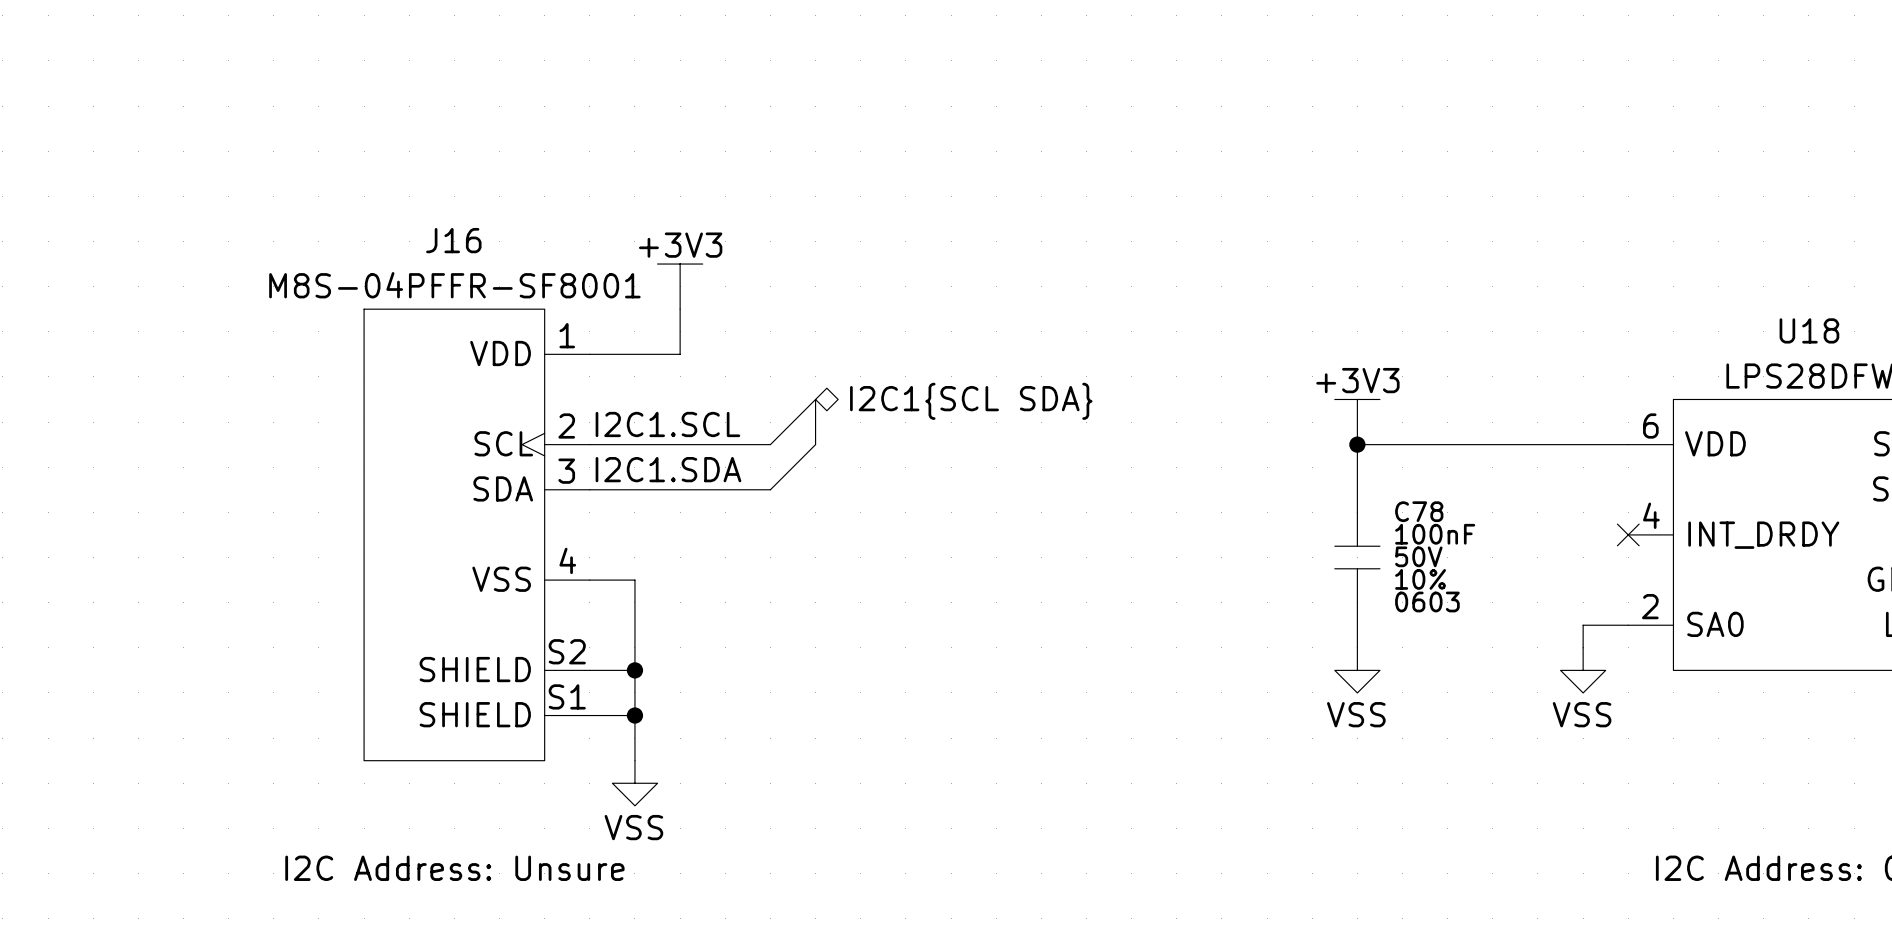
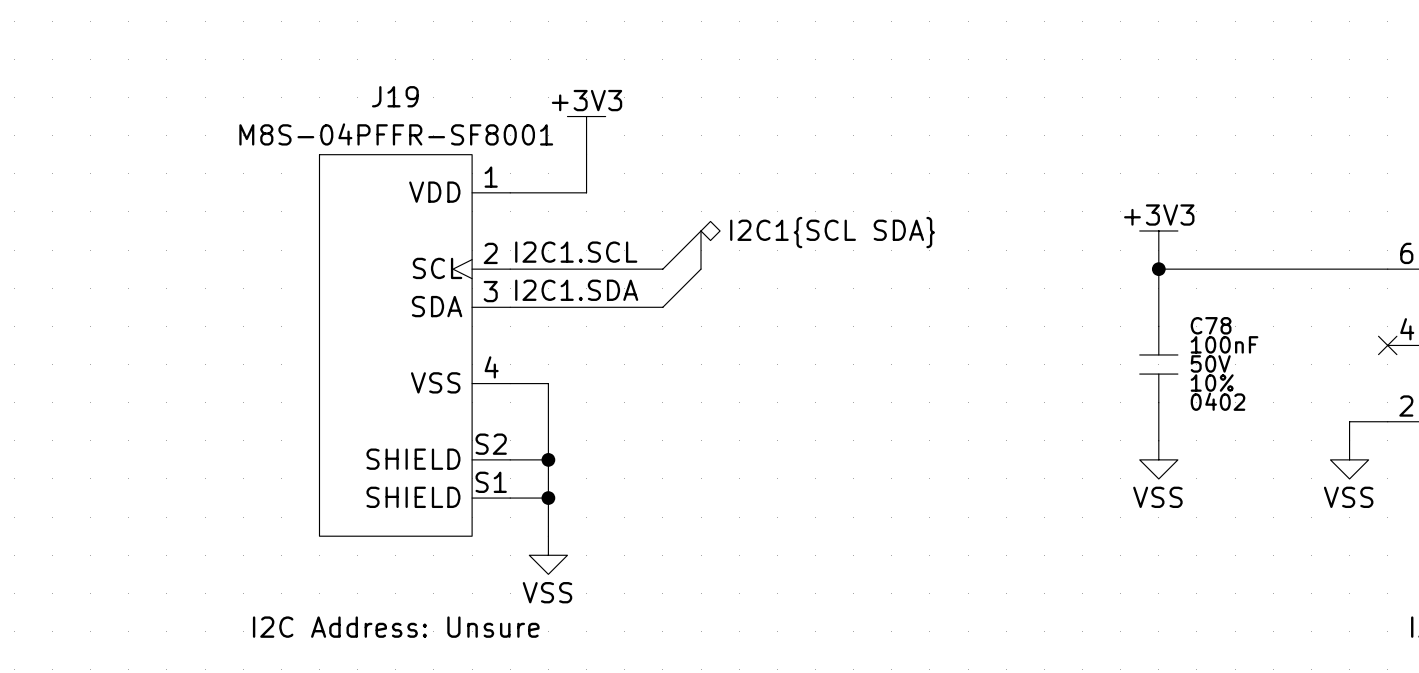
J16 name: J16 (453, 240) -> J19 (395, 96)
C78 text: 0603 (1427, 601) -> 0402 (1218, 401)

